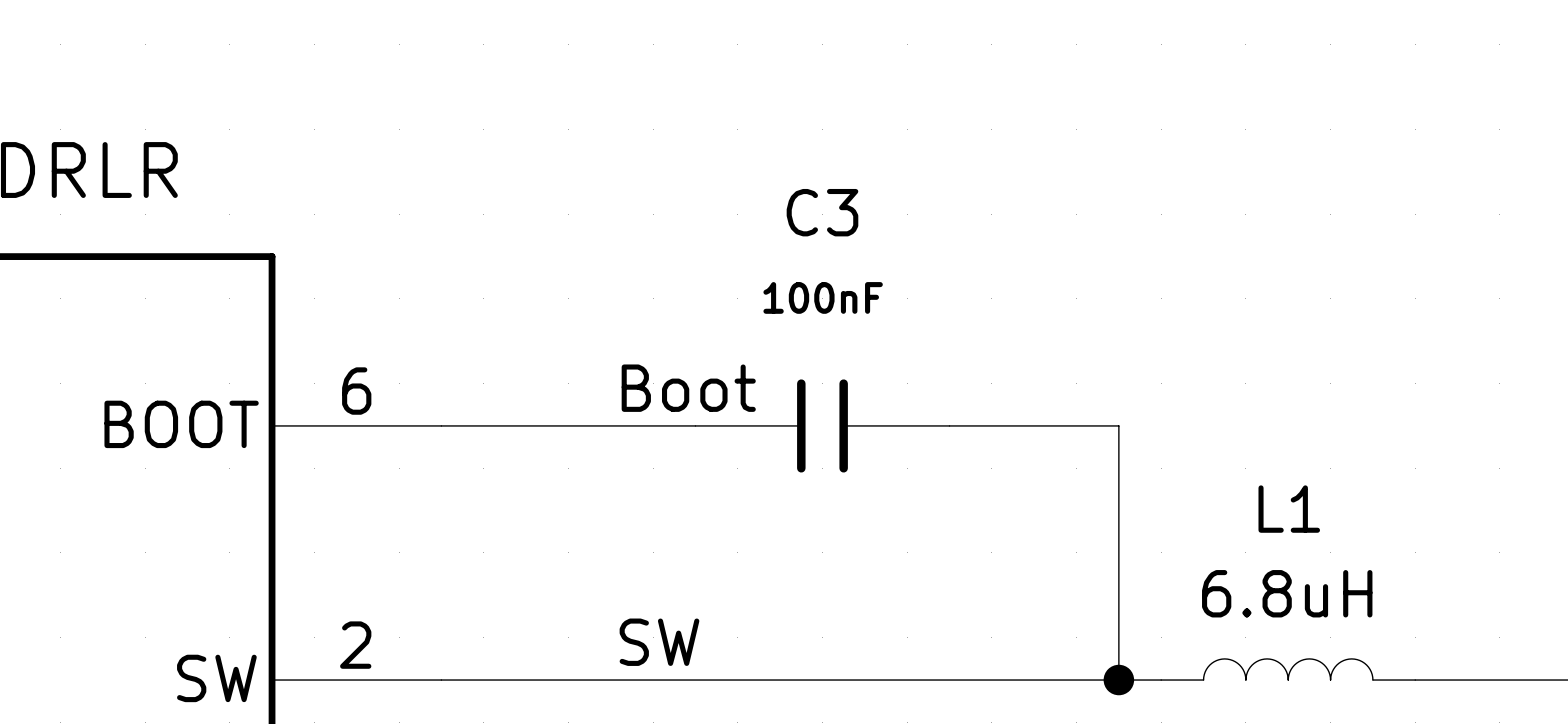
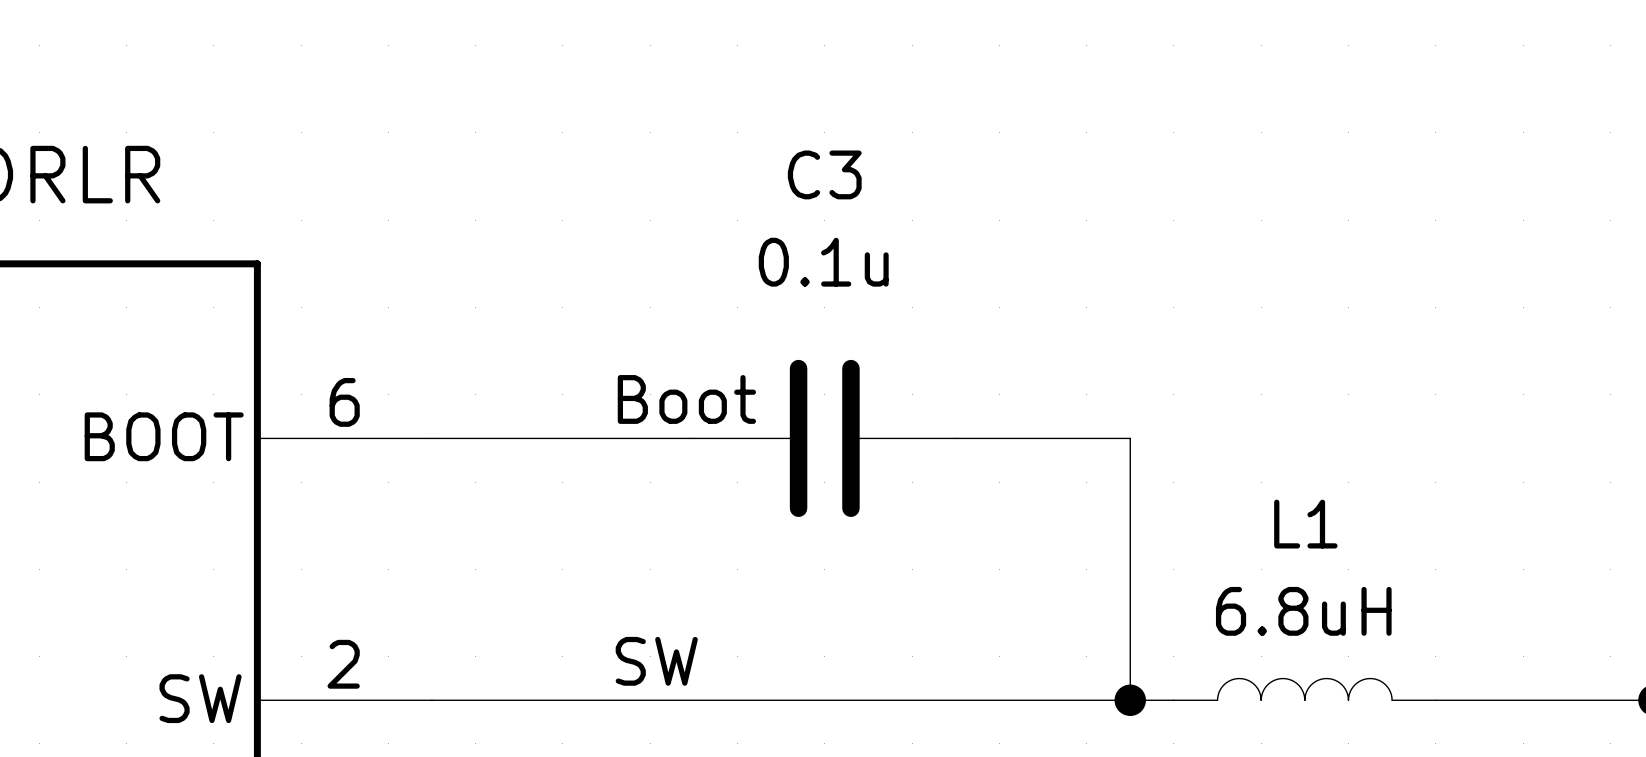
C3 name position: C3 (822, 212) -> C3 (824, 174)
C3 value: 100nF (823, 297) -> 0.1u (823, 262)
C3 symbol: [695, 379, 950, 473] -> [693, 359, 956, 517]

